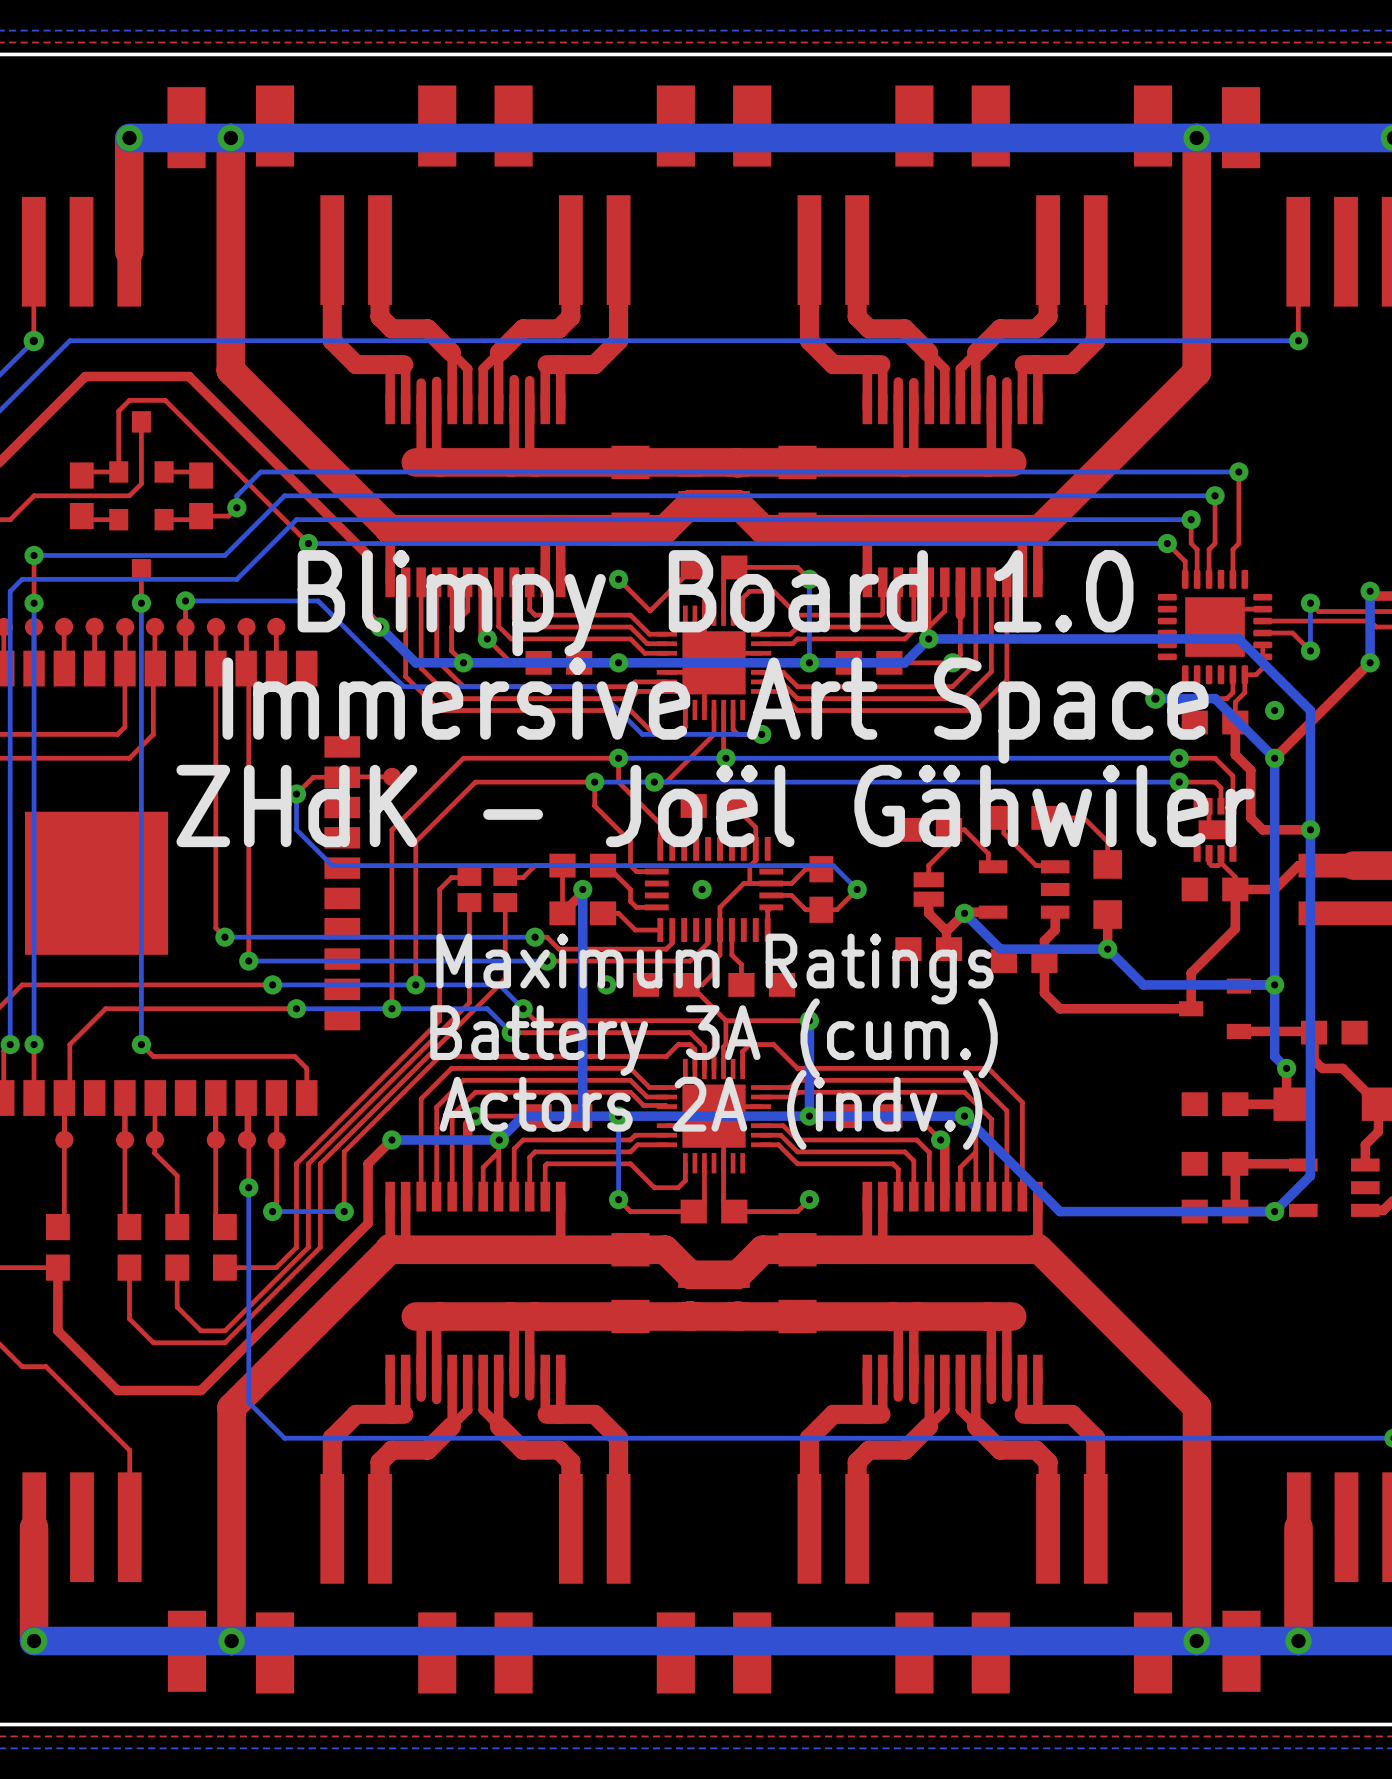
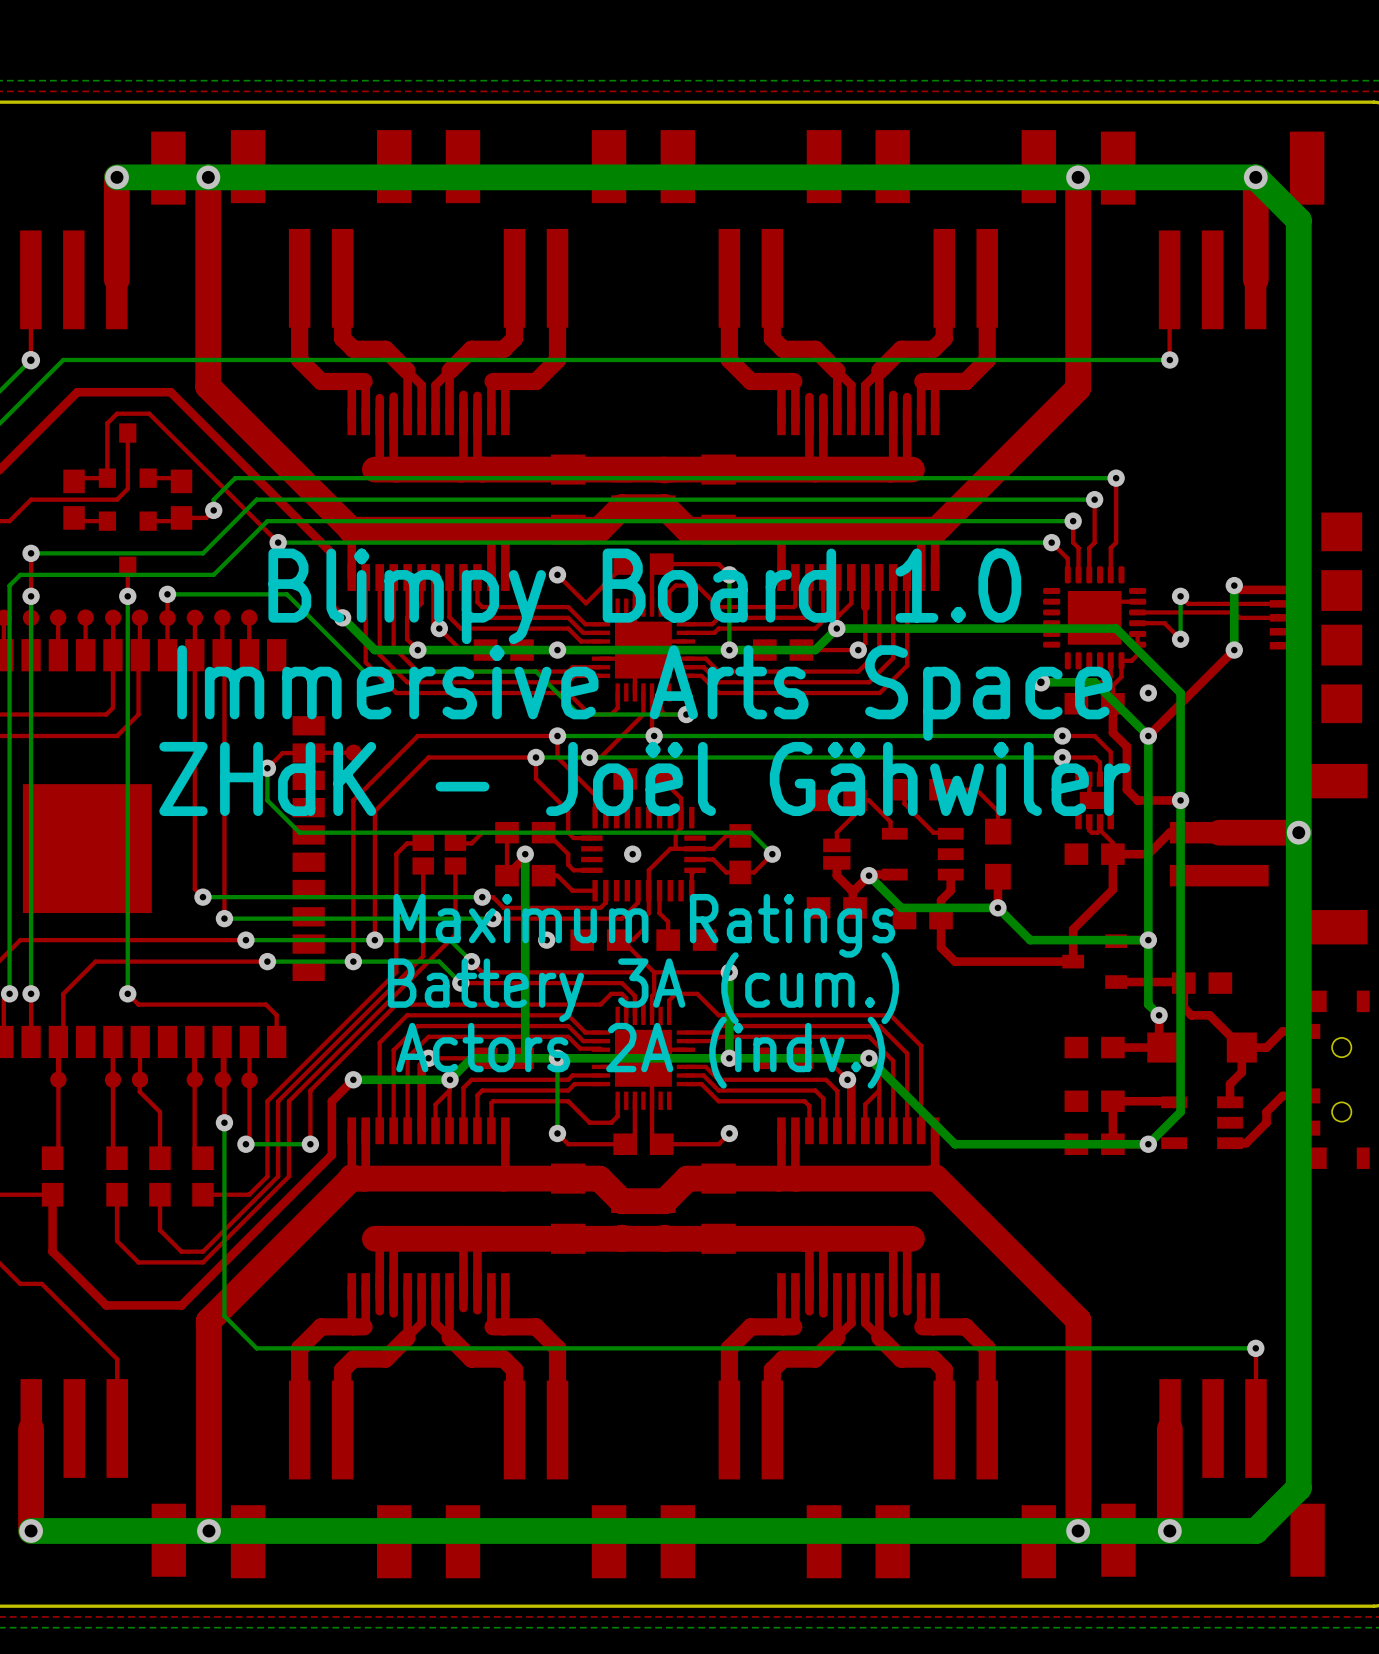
text: Immersive Art Space (715, 710) -> Immersive Arts Space (644, 693)

